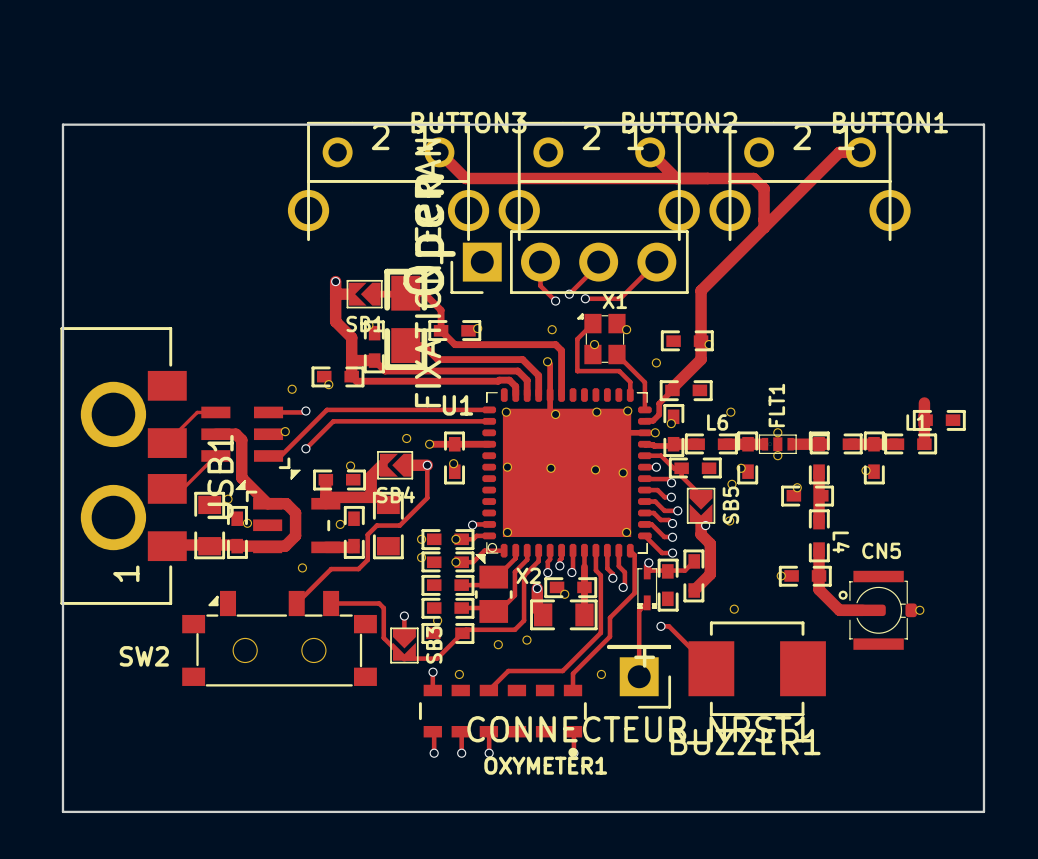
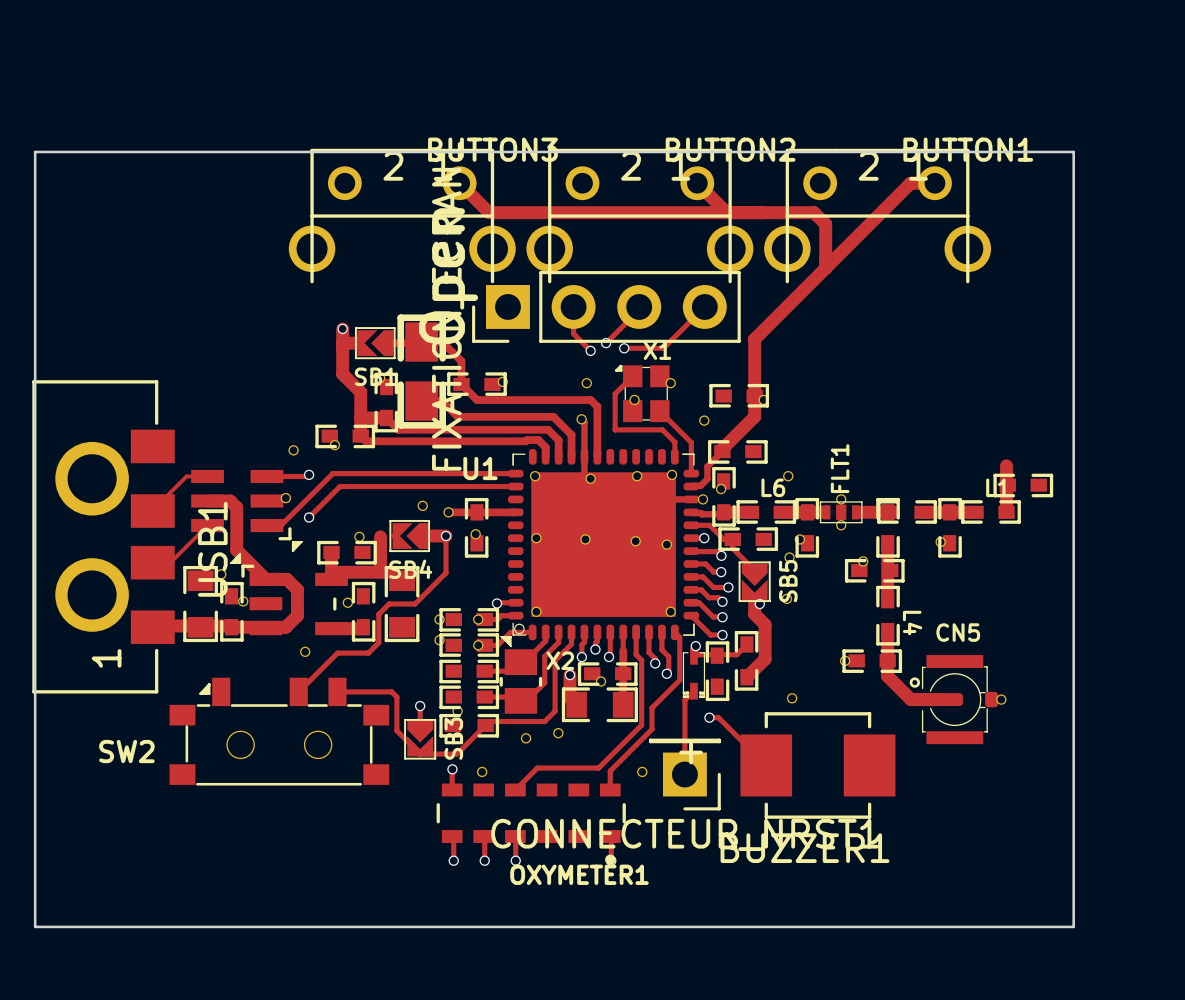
track: none -> (380, 536) (380, 571)
track: (382, 465) (371, 476) (371, 496) -> none

